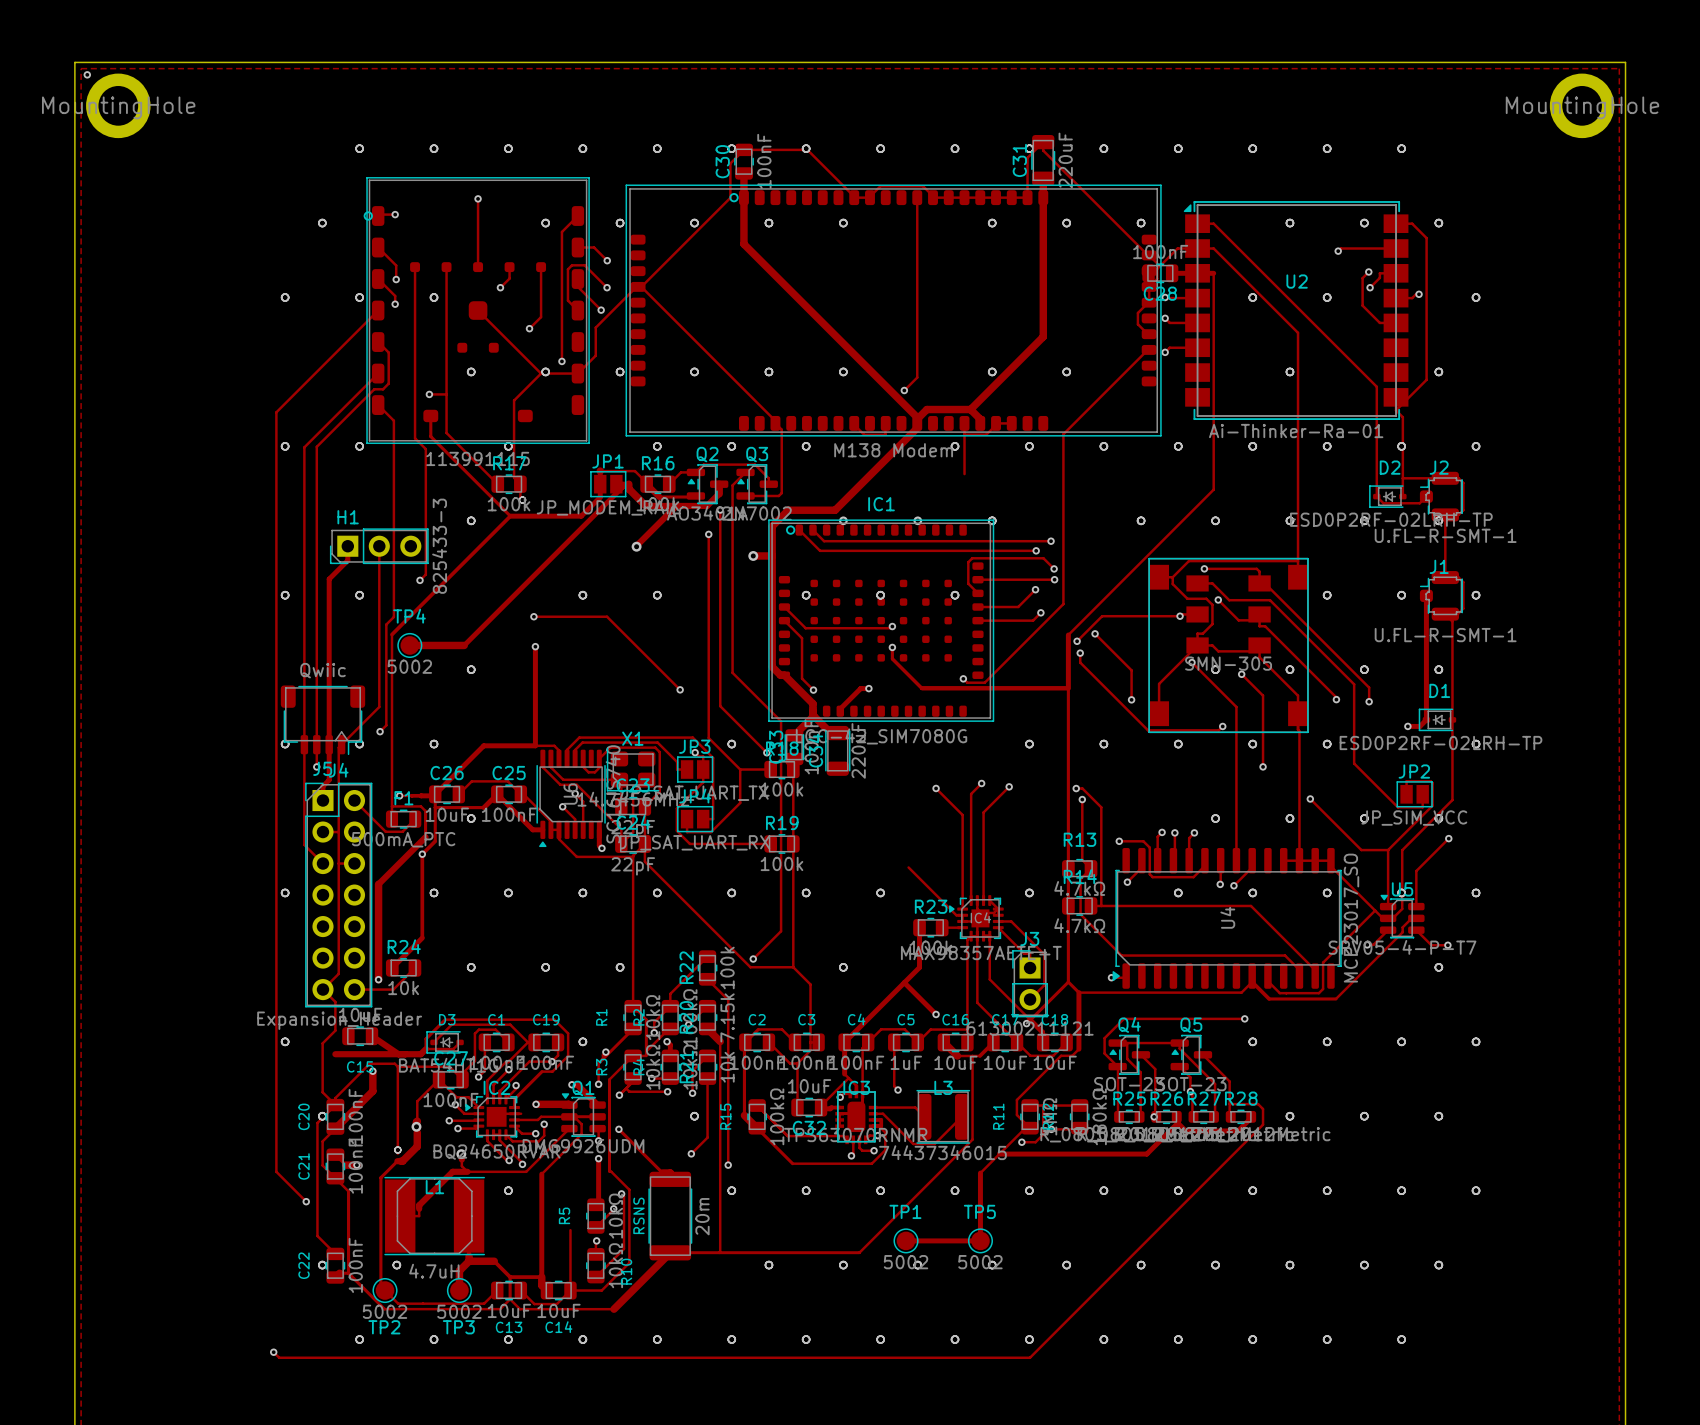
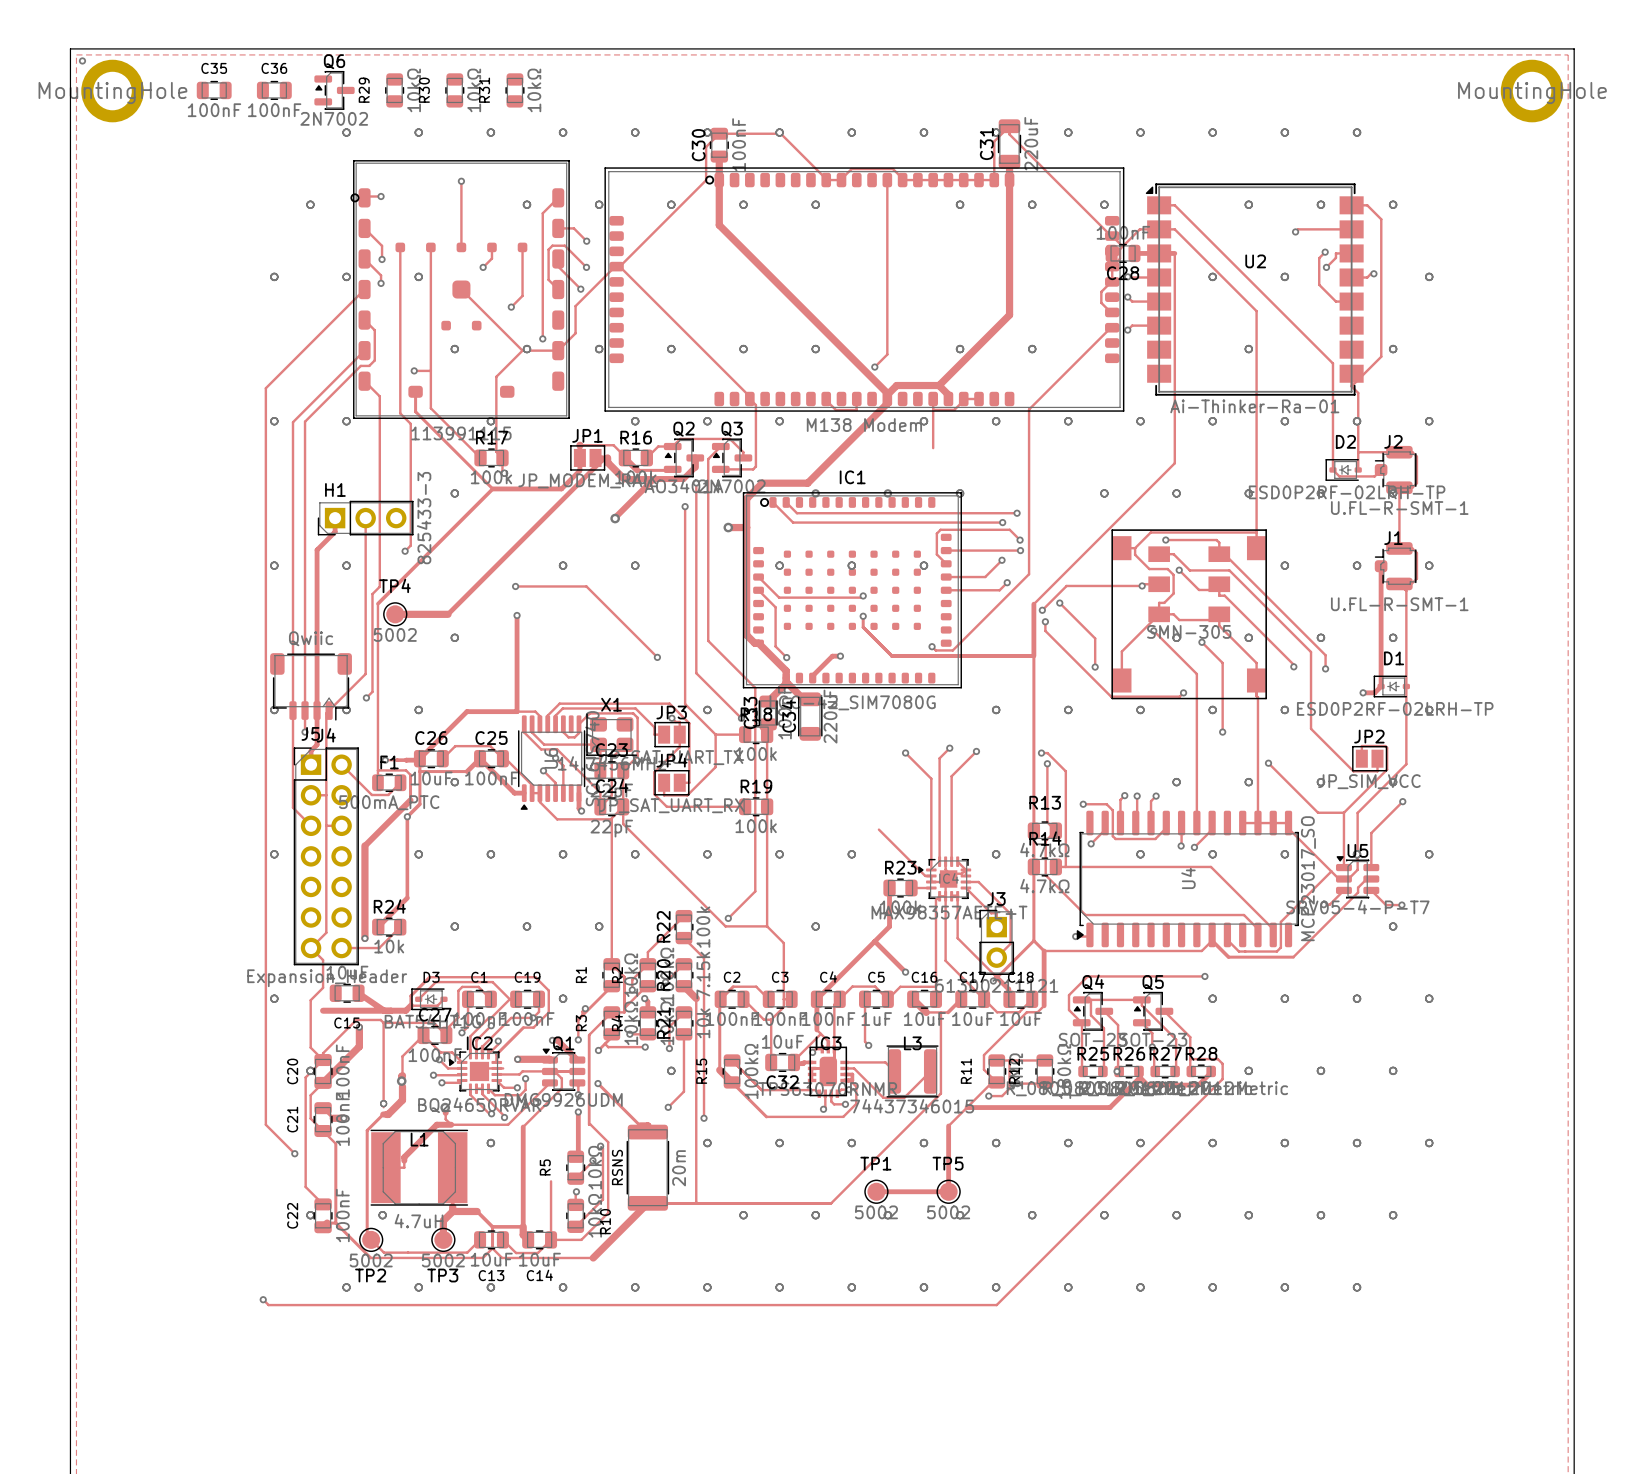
C35: none -> 100nF (214, 90)
C36: none -> 100nF (274, 90)
Q6: none -> 2N7002 (334, 90)
R29: none -> 10kΩ (394, 90)
R30: none -> 10kΩ (454, 90)
R31: none -> 10kΩ (514, 90)

